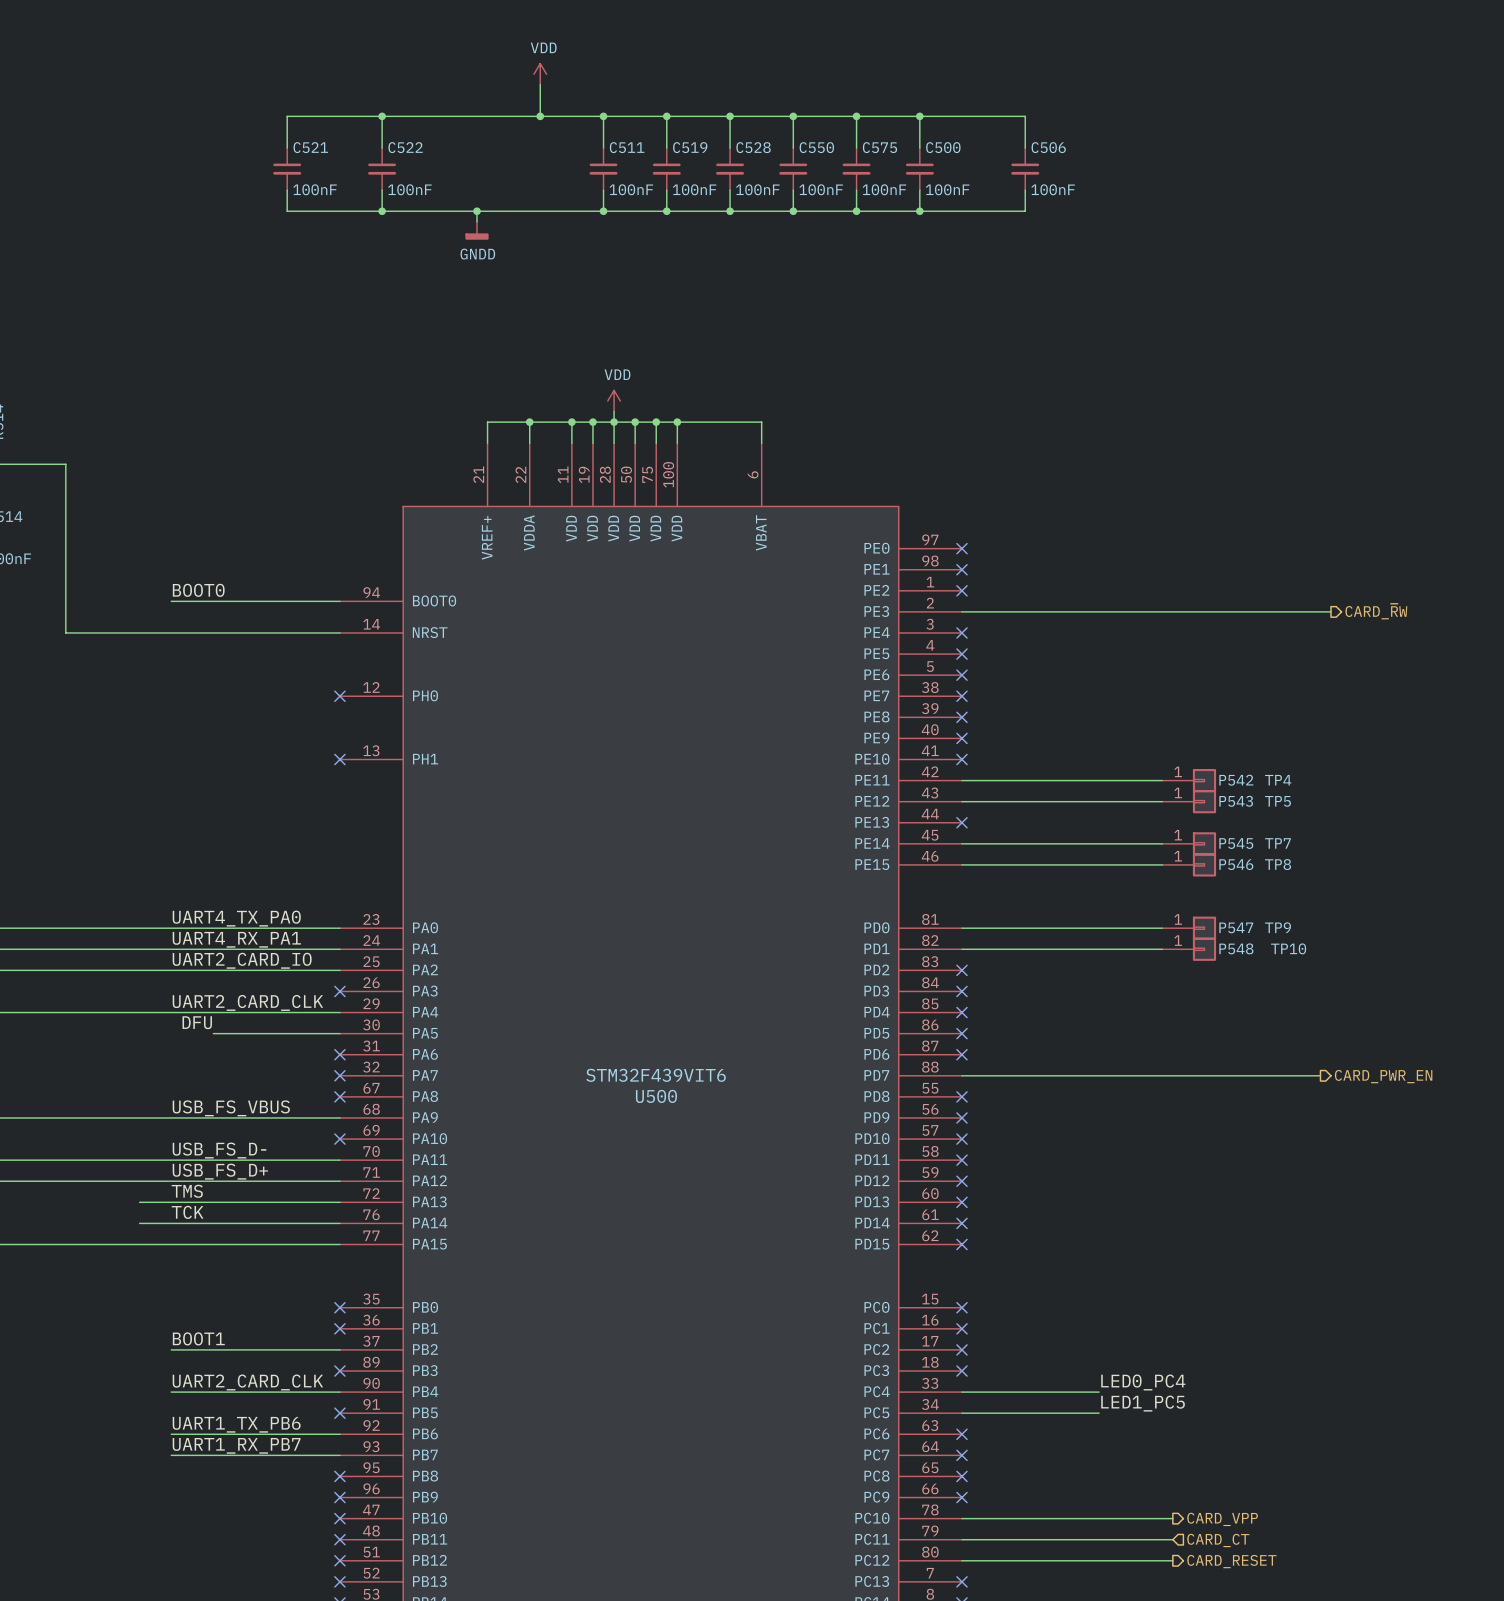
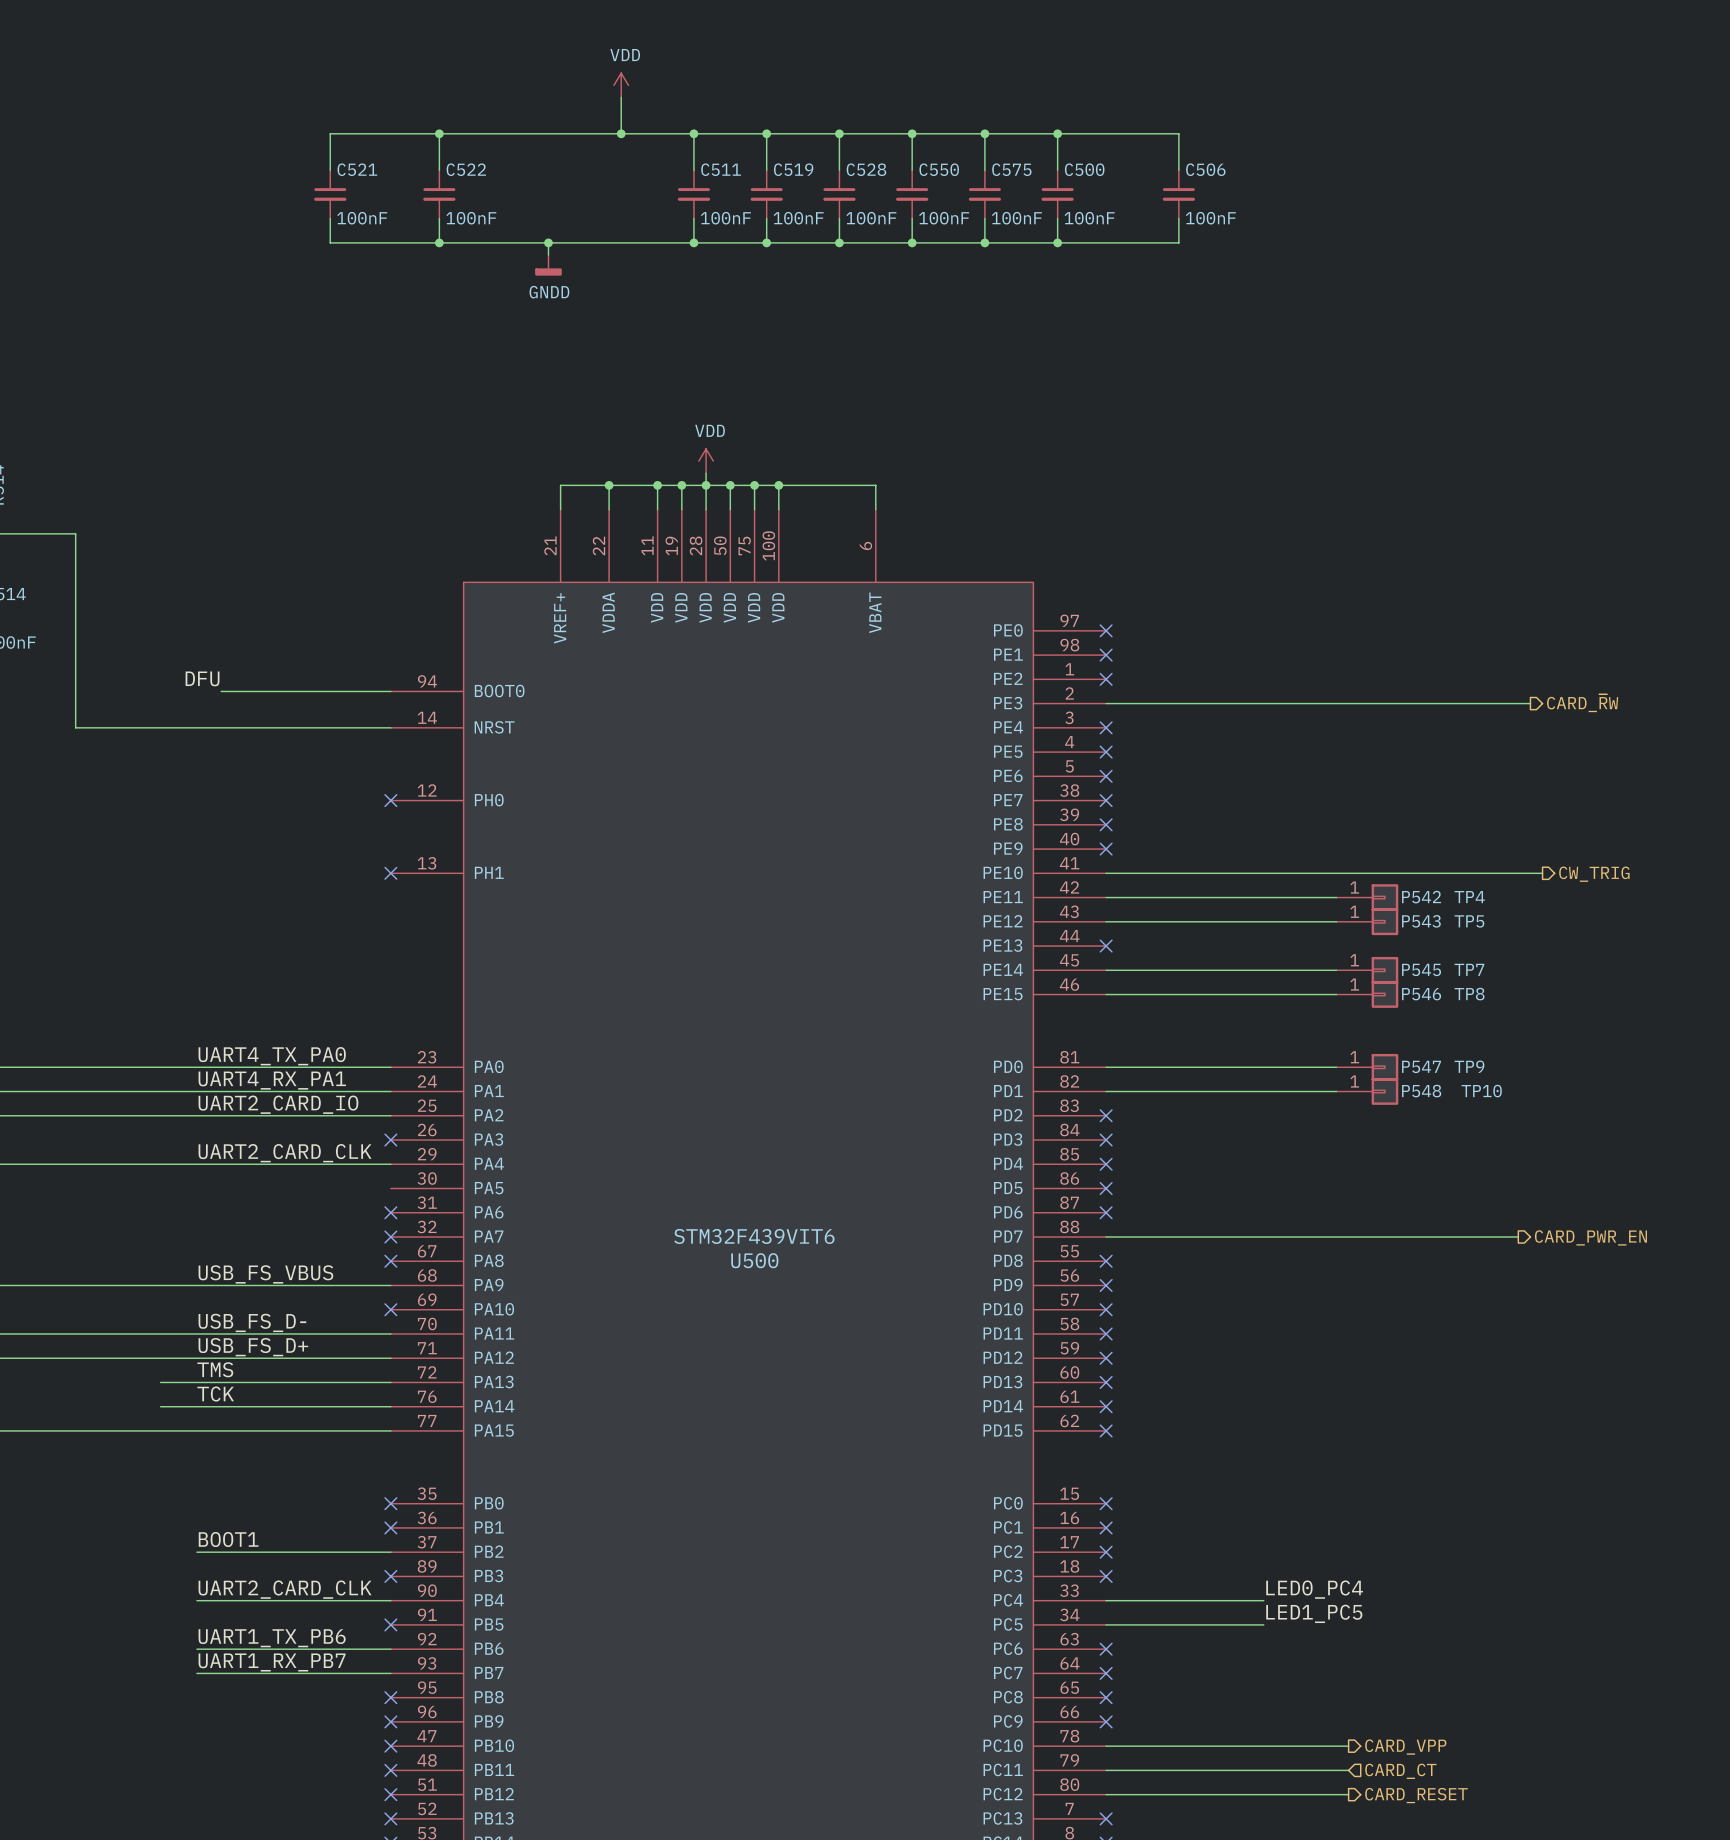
label: none -> DFU (202, 678)
label: BOOT0 (198, 590) -> none
wire: (171, 601) (192, 601) -> none
wire: none -> (1106, 873) (1542, 873)
no-connect mark: (961, 759) -> none
hierarchical label: none -> CW_TRIG (1594, 874)
label: DFU (197, 1022) -> none
wire: (213, 1033) (339, 1033) -> none

